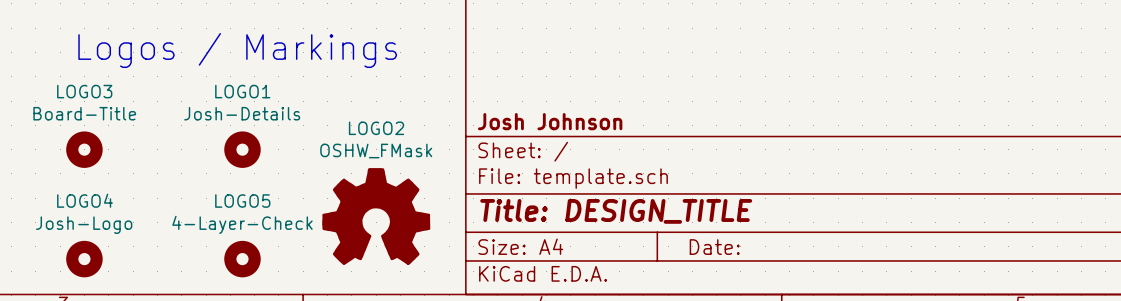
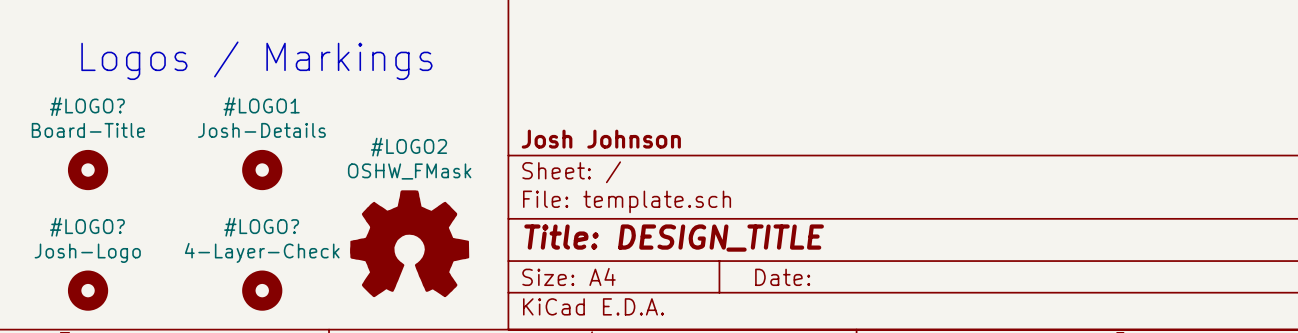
LOGO3: Board-Title (84, 149) -> none
#LOGO?: none -> Board-Title (88, 170)
LOGO1: Josh-Details (242, 149) -> none
#LOGO1: none -> Josh-Details (262, 170)
LOGO2: OSHW_FMask (376, 216) -> none
#LOGO2: none -> OSHW_FMask (409, 243)
LOGO4: Josh-Logo (84, 259) -> none
#LOGO?: none -> Josh-Logo (88, 290)
LOGO5: 4-Layer-Check (242, 259) -> none
#LOGO?: none -> 4-Layer-Check (262, 290)

